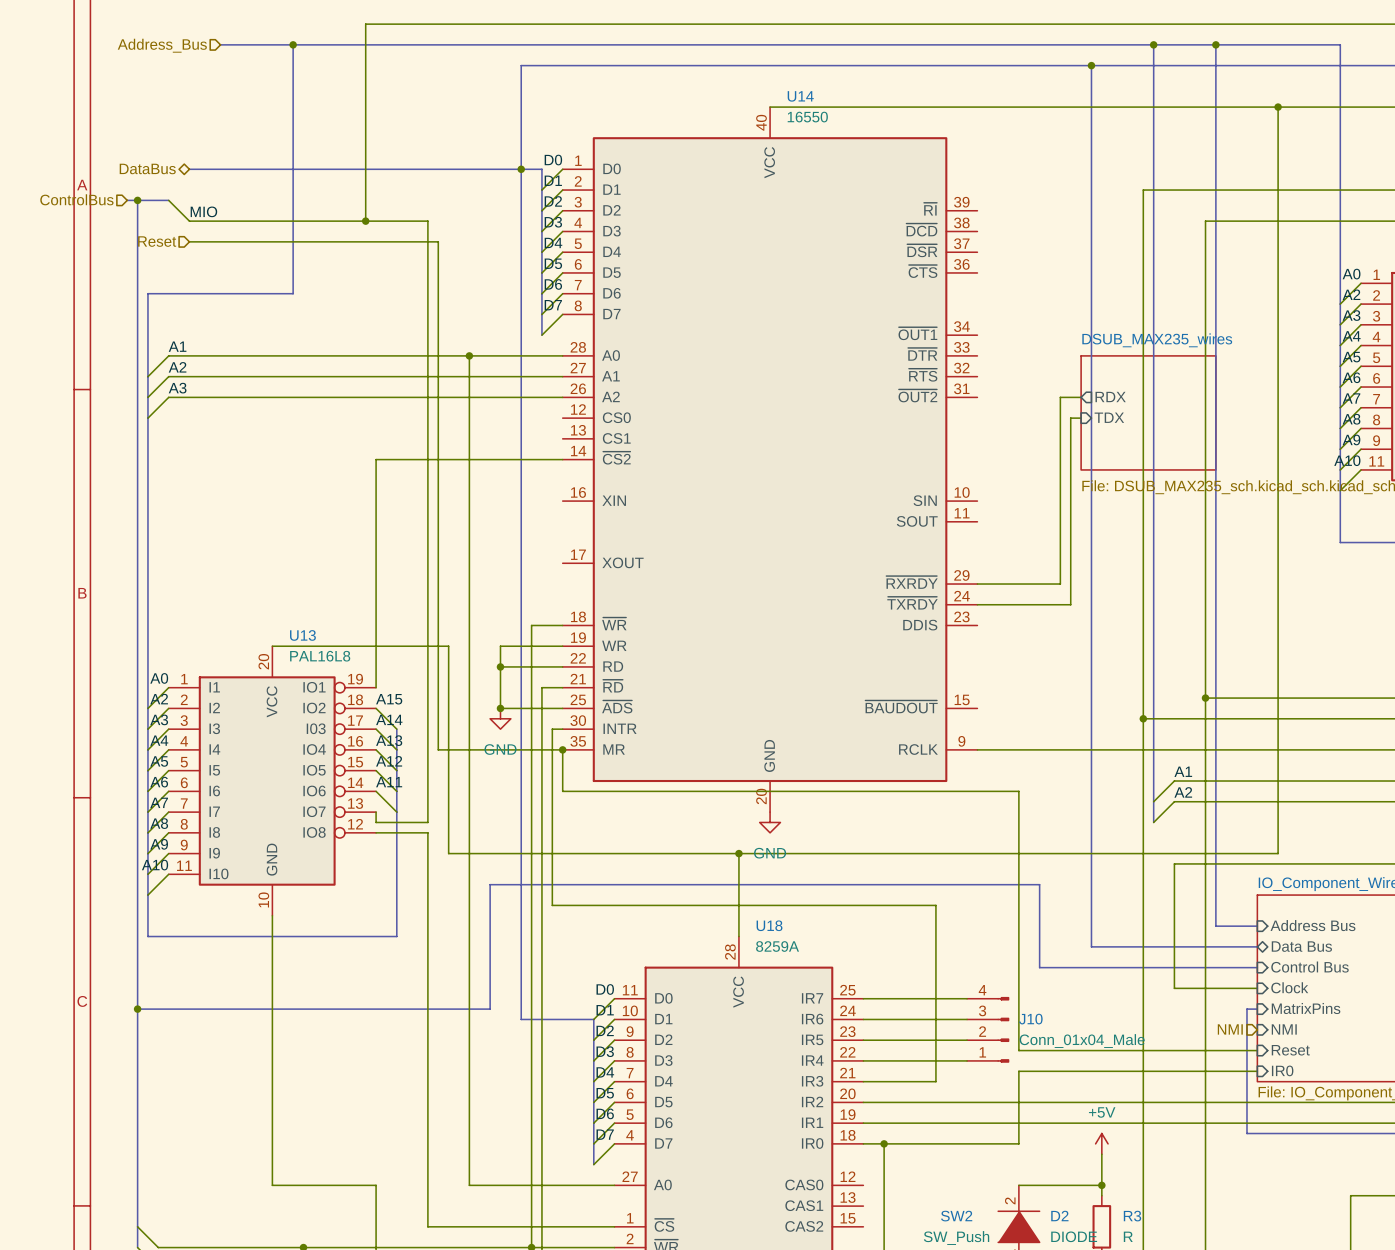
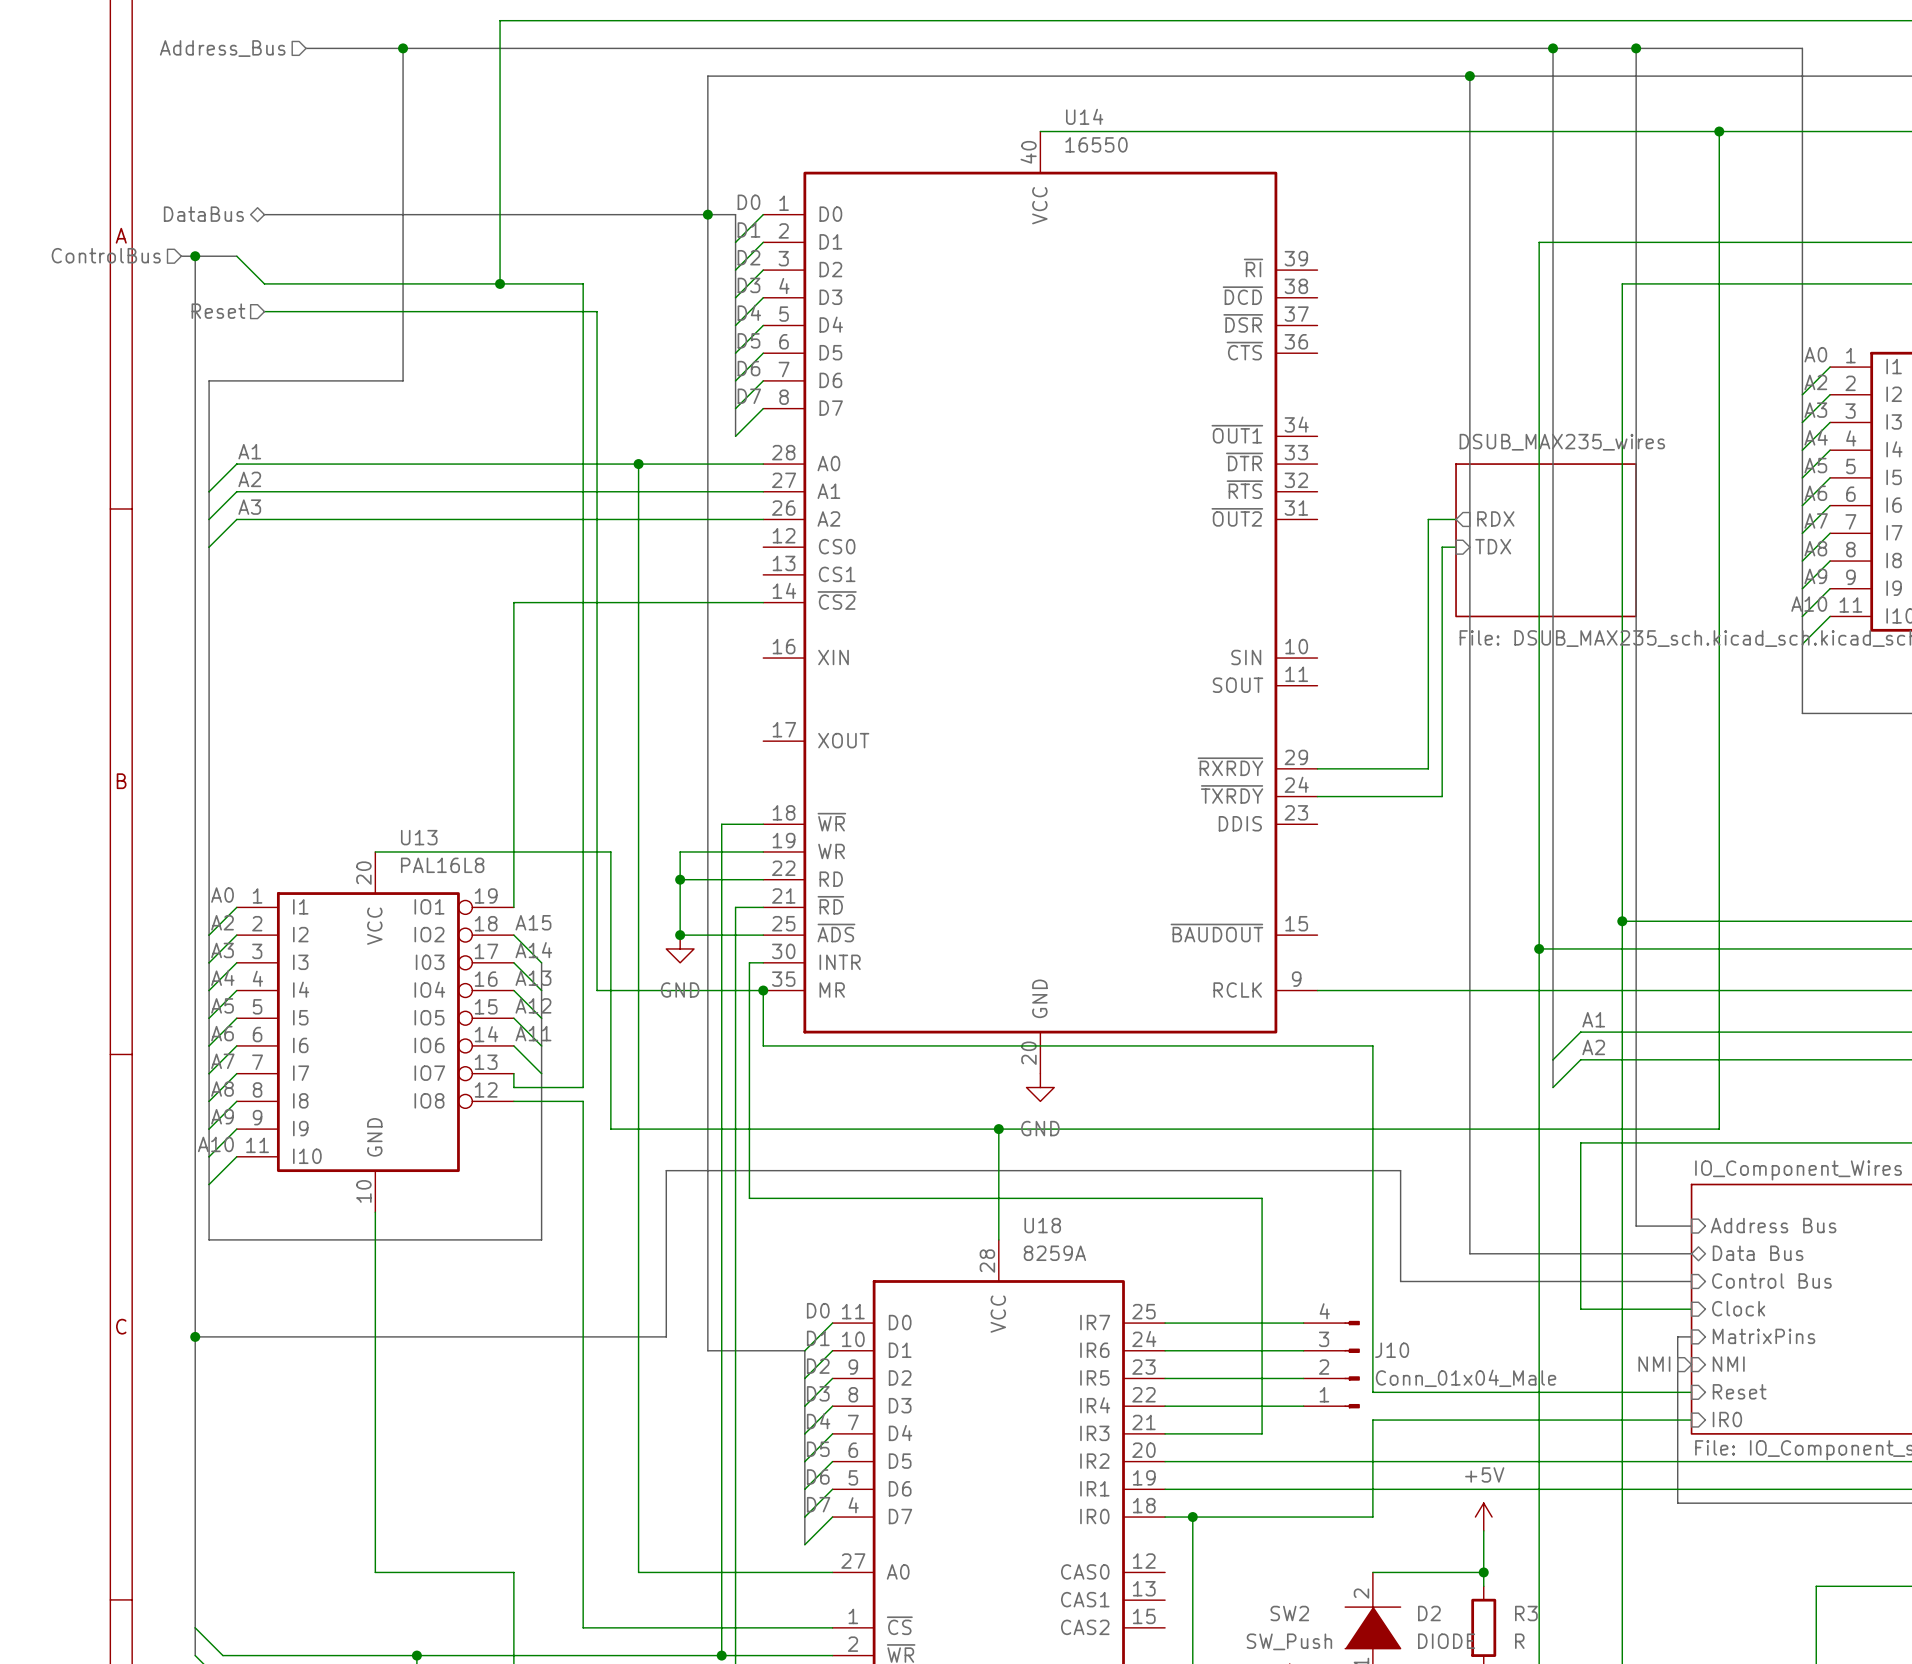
label: MIO (203, 211) -> none

